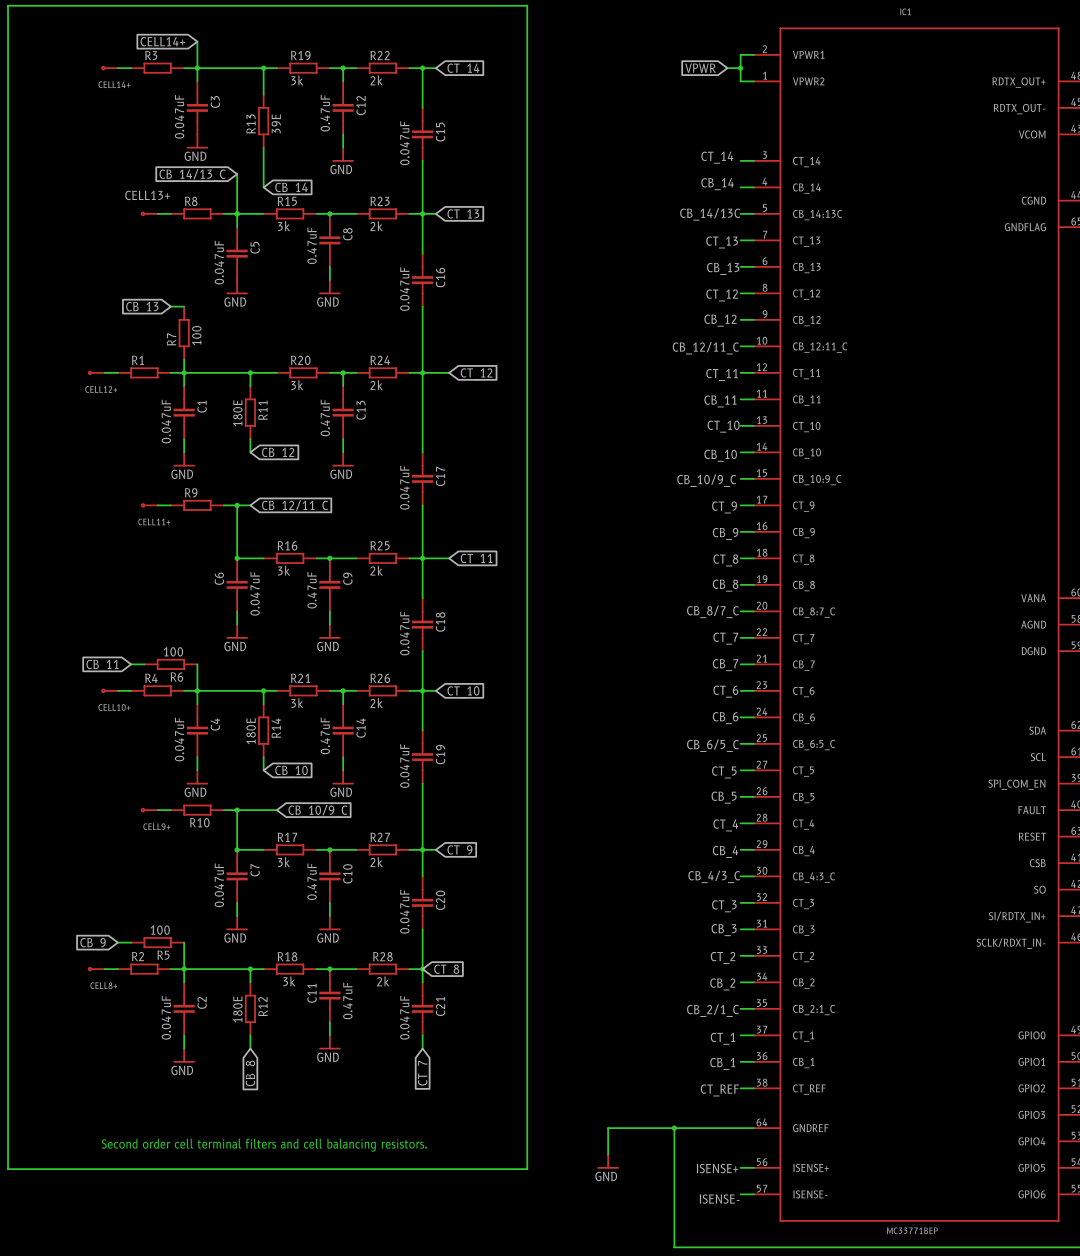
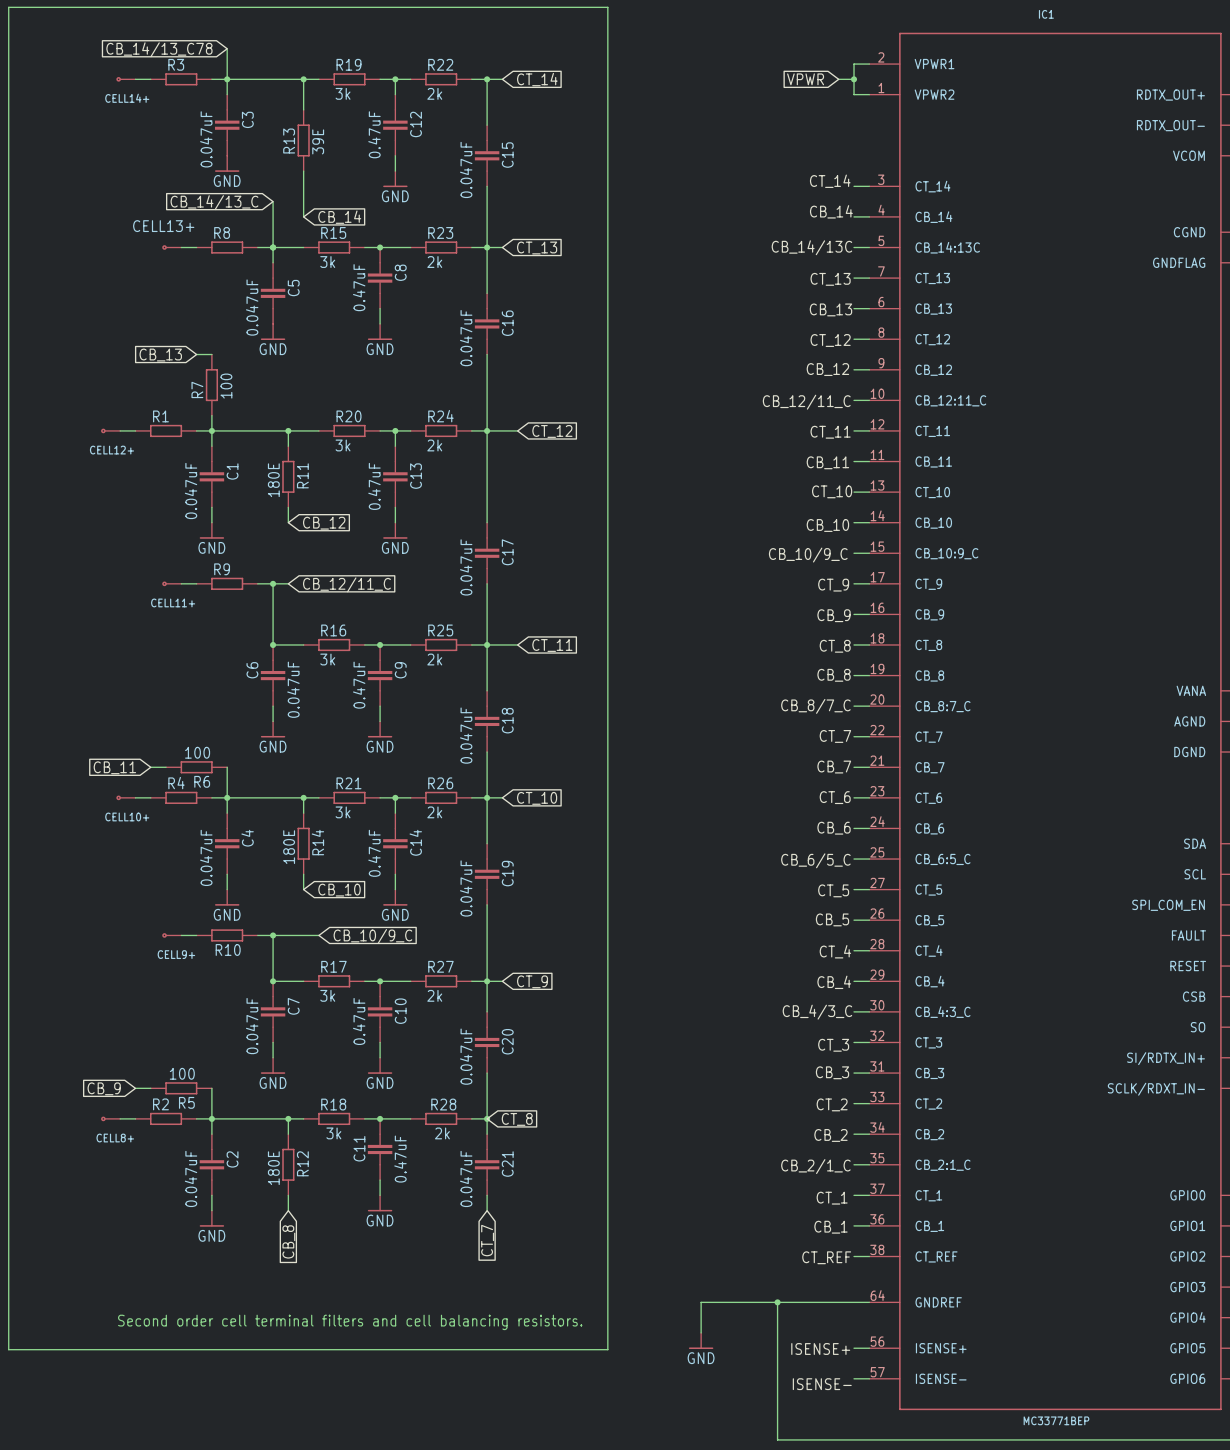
global label: CELL14+ (162, 41) -> CB_14/13_C78 (159, 49)

